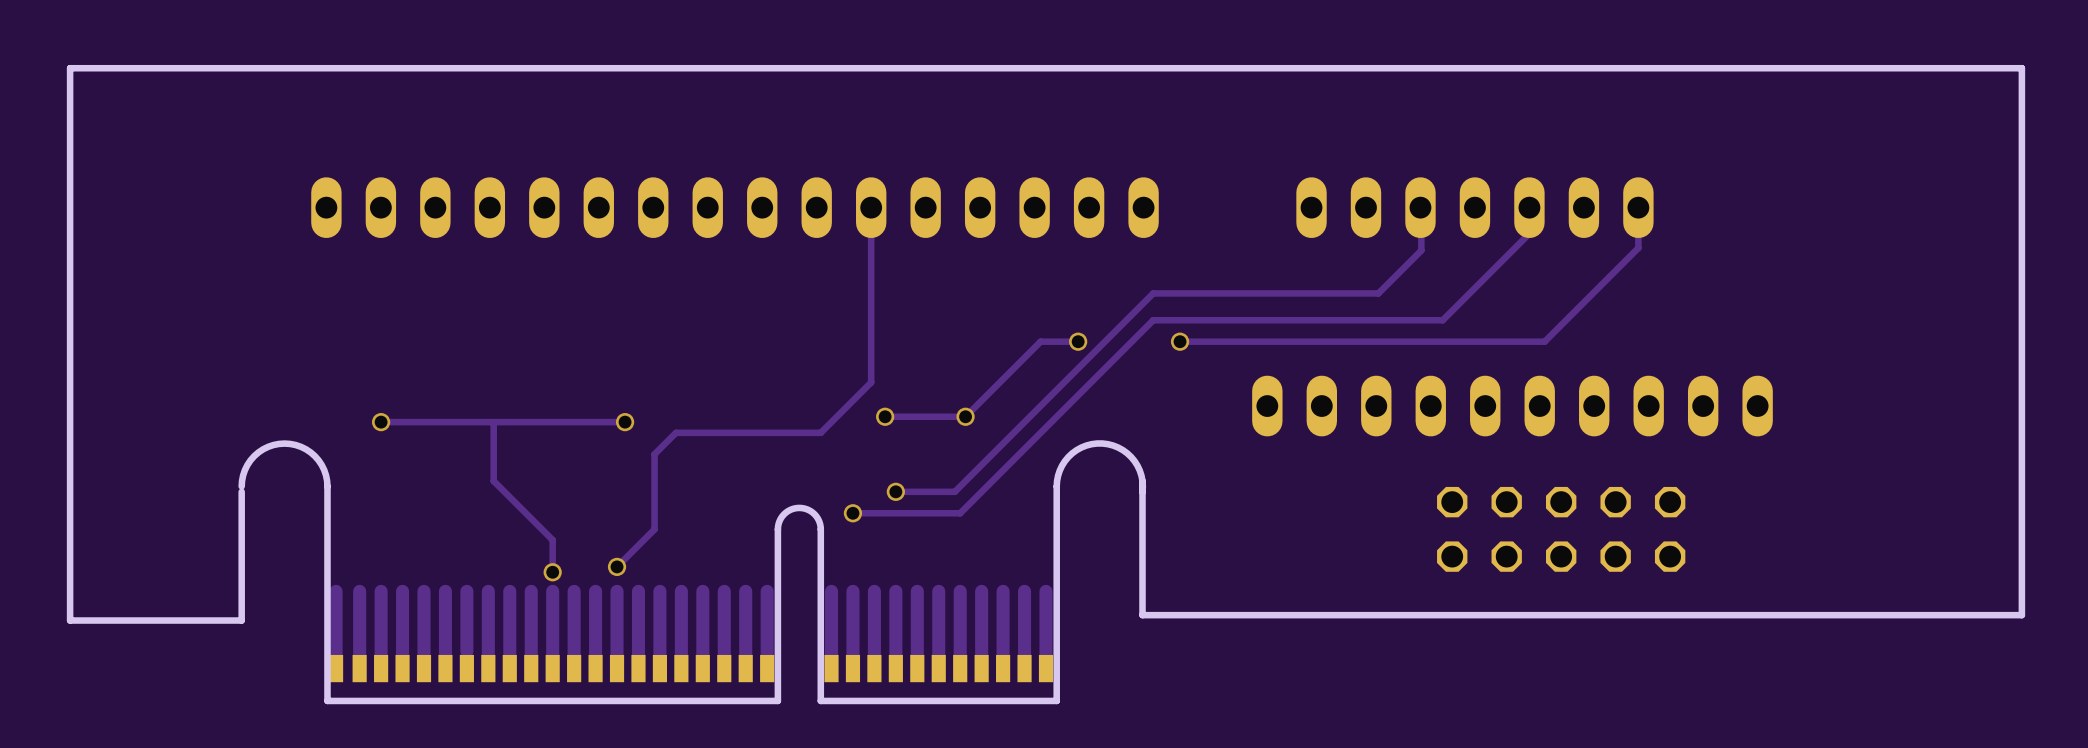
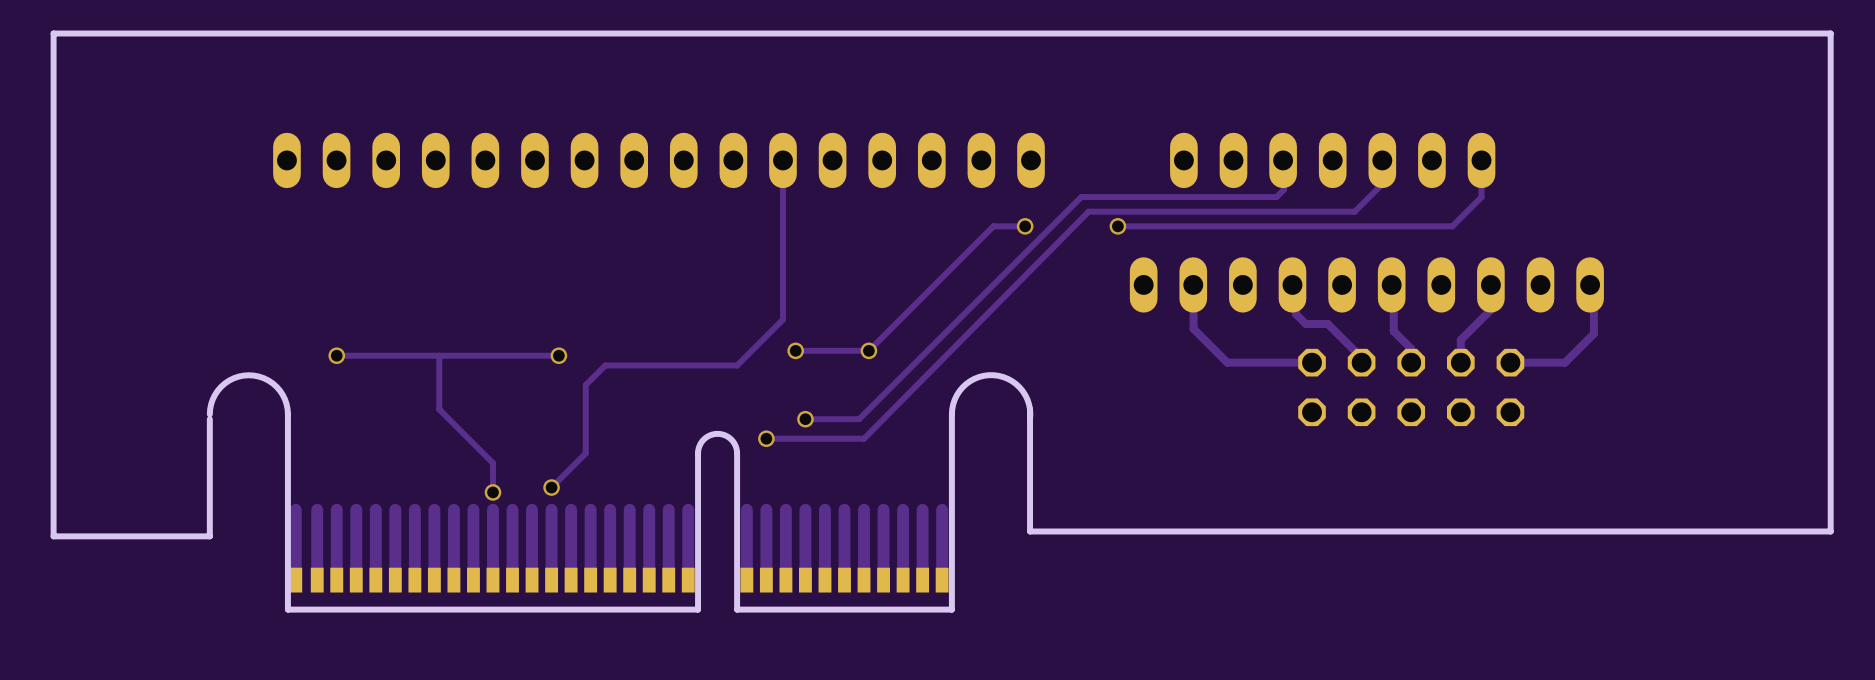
track: (1421, 239) (1421, 250) (1378, 293) (1153, 293) -> (1283, 189) (1276, 197) (1081, 197) (1039, 238)
track: (1499, 263) (1442, 320) (1153, 320) (960, 513) -> (1354, 211) (1088, 211) (864, 438)
via: none -> (1025, 226)
via: none -> (1117, 226)
track: (1606, 280) (1544, 341) (1180, 341) -> (1452, 226) (1117, 226)
track: (1078, 341) (1040, 341) -> (1025, 226) (993, 226) (937, 282)
via: (1078, 341) -> none
via: (1180, 341) -> none
track: none -> (1193, 284) (1193, 328) (1227, 362) (1312, 362)
track: none -> (1292, 284) (1296, 288) (1296, 314) (1305, 323) (1327, 323) (1361, 357) (1361, 362)
track: none -> (1391, 284) (1393, 286) (1393, 331) (1411, 348) (1411, 362)
track: none -> (1491, 284) (1491, 309) (1460, 339) (1460, 362)
track: none -> (1590, 284) (1593, 288) (1593, 333) (1565, 362) (1510, 362)
part position: (1512, 406) -> (1366, 284)
part position: (1561, 529) -> (1411, 387)

